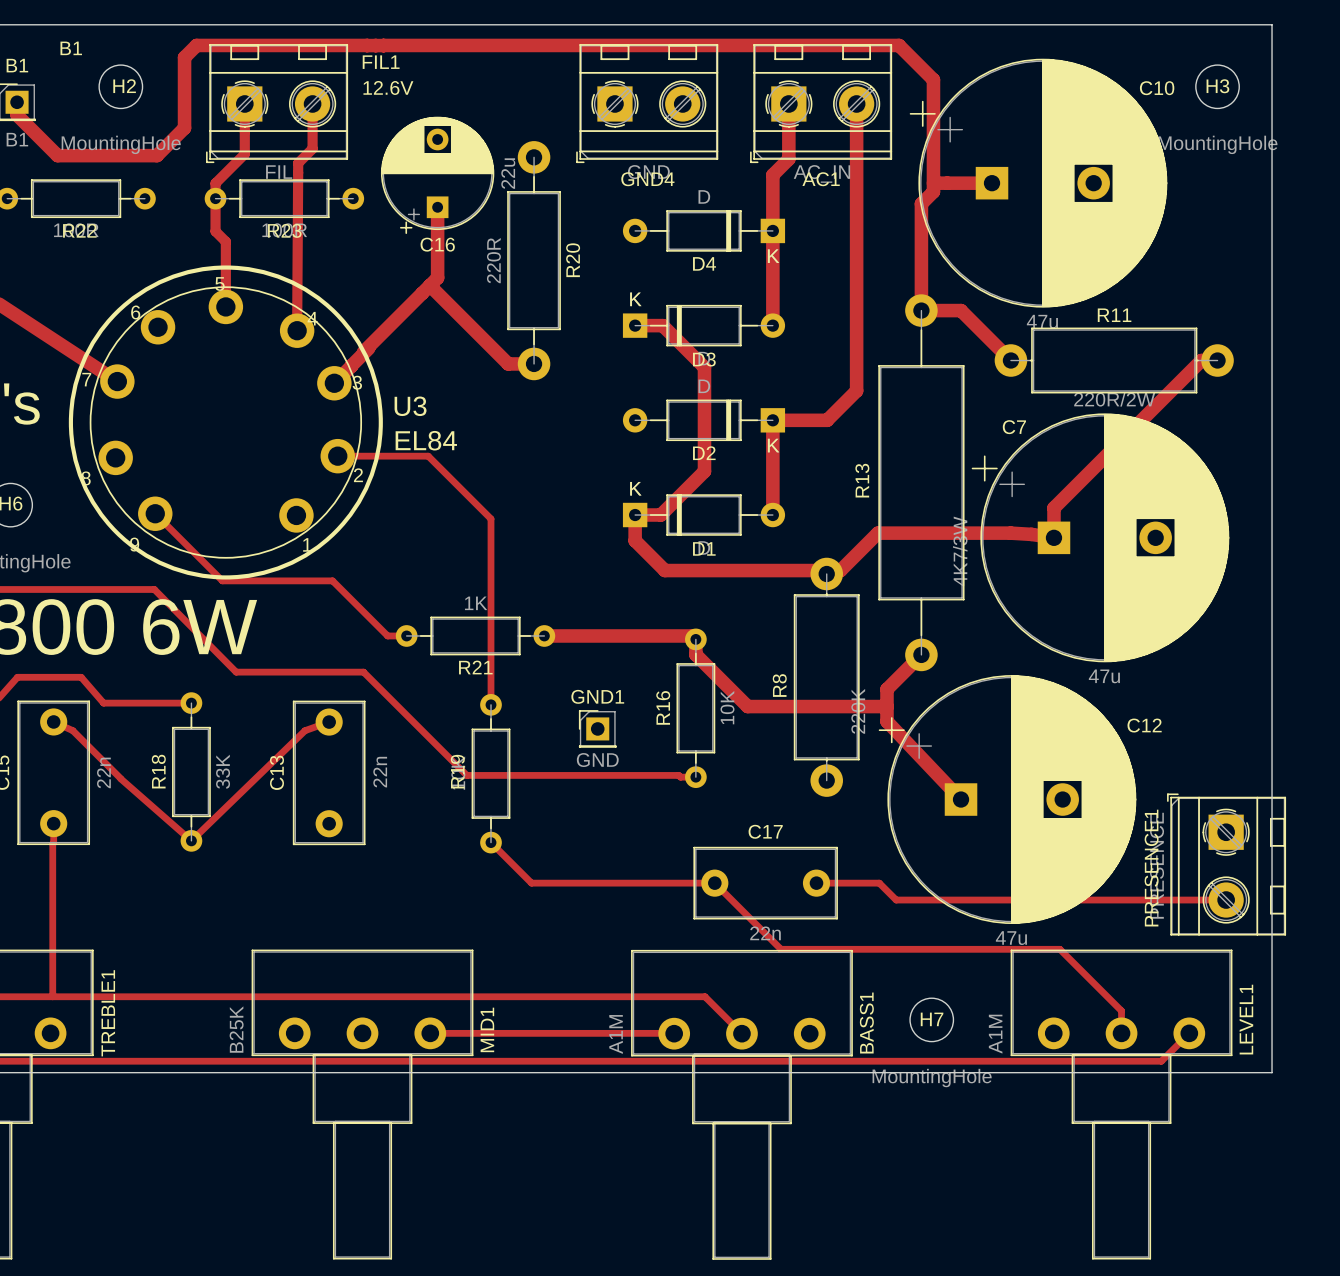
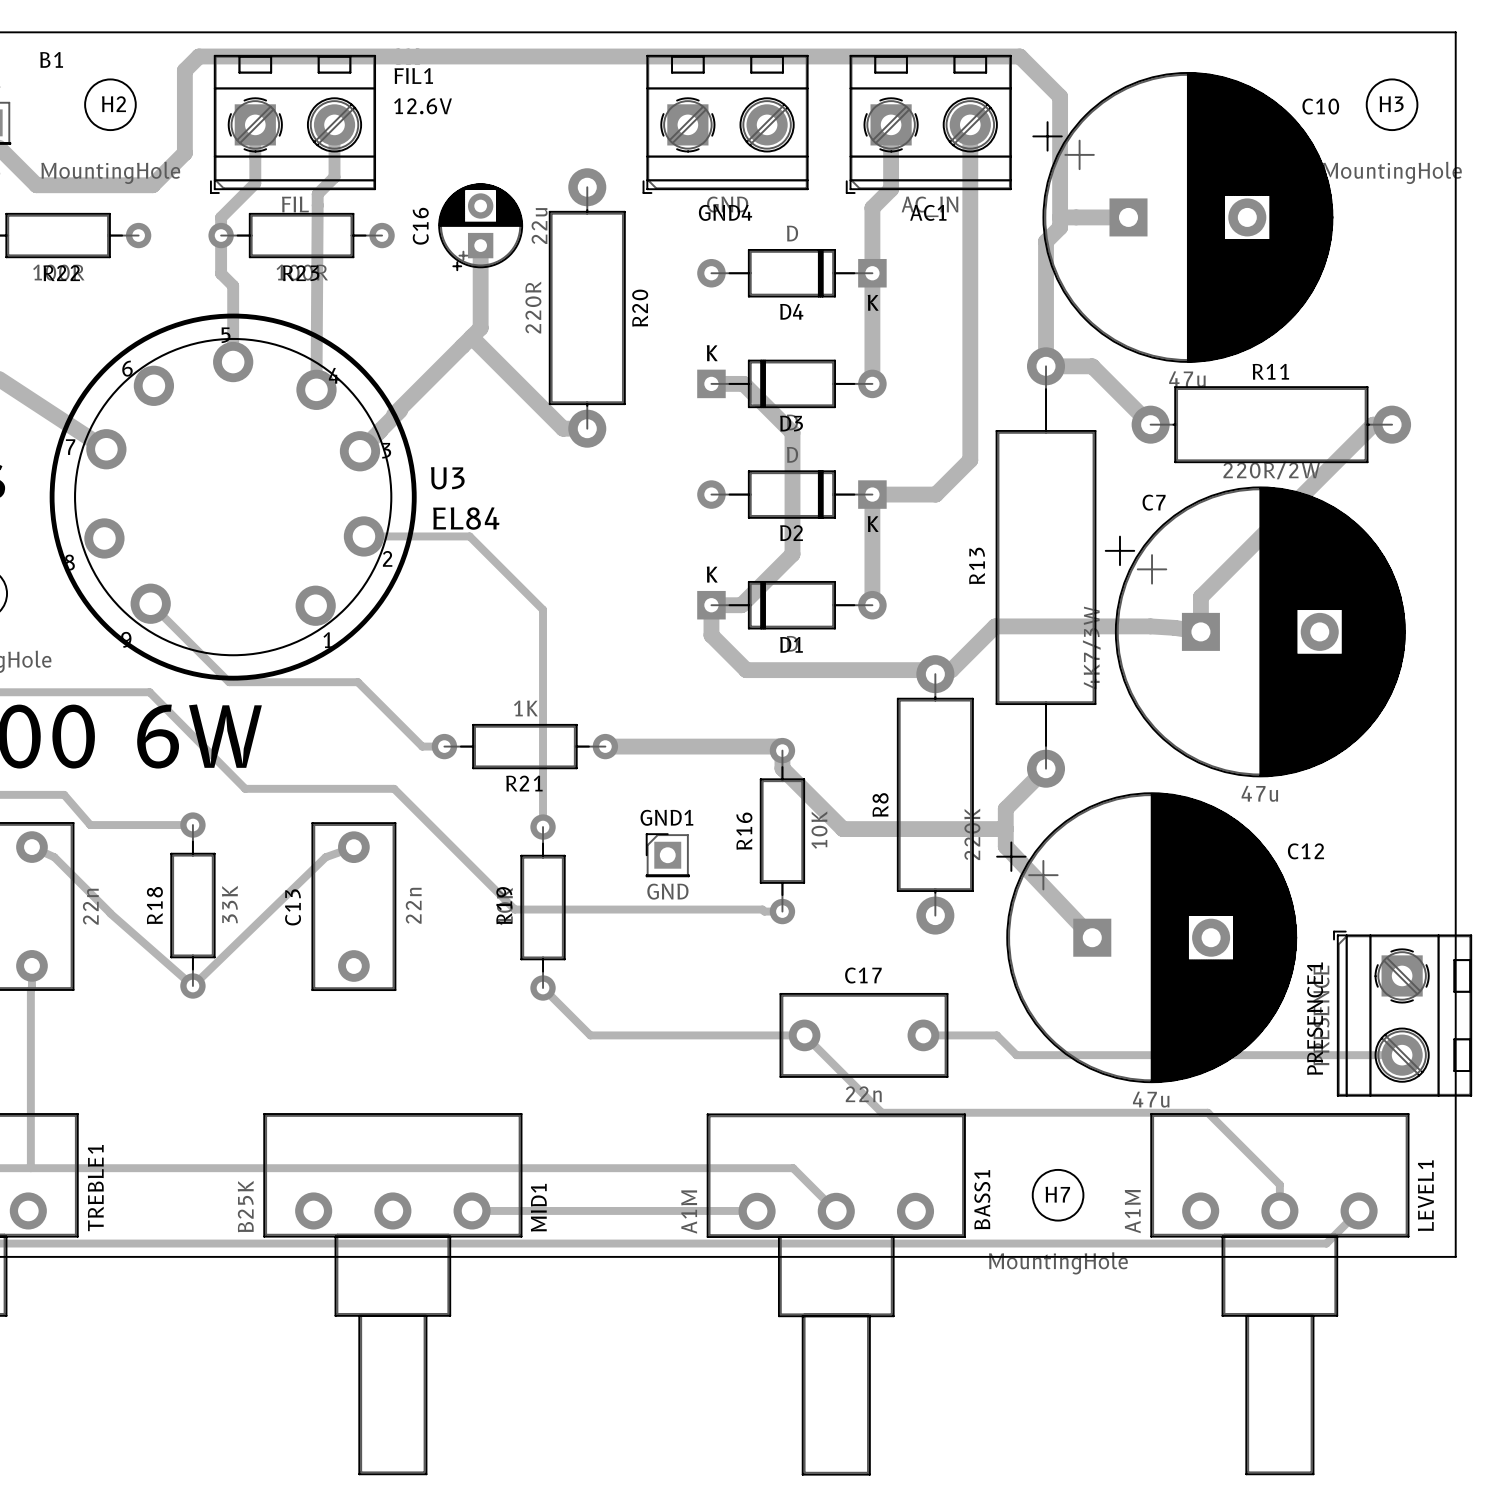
C16 footprint: [380, 116, 495, 234] -> [438, 183, 524, 272]
R20 footprint: [507, 141, 561, 381] -> [548, 168, 626, 448]
C16 name position: C16 (437, 244) -> C16 (420, 226)

